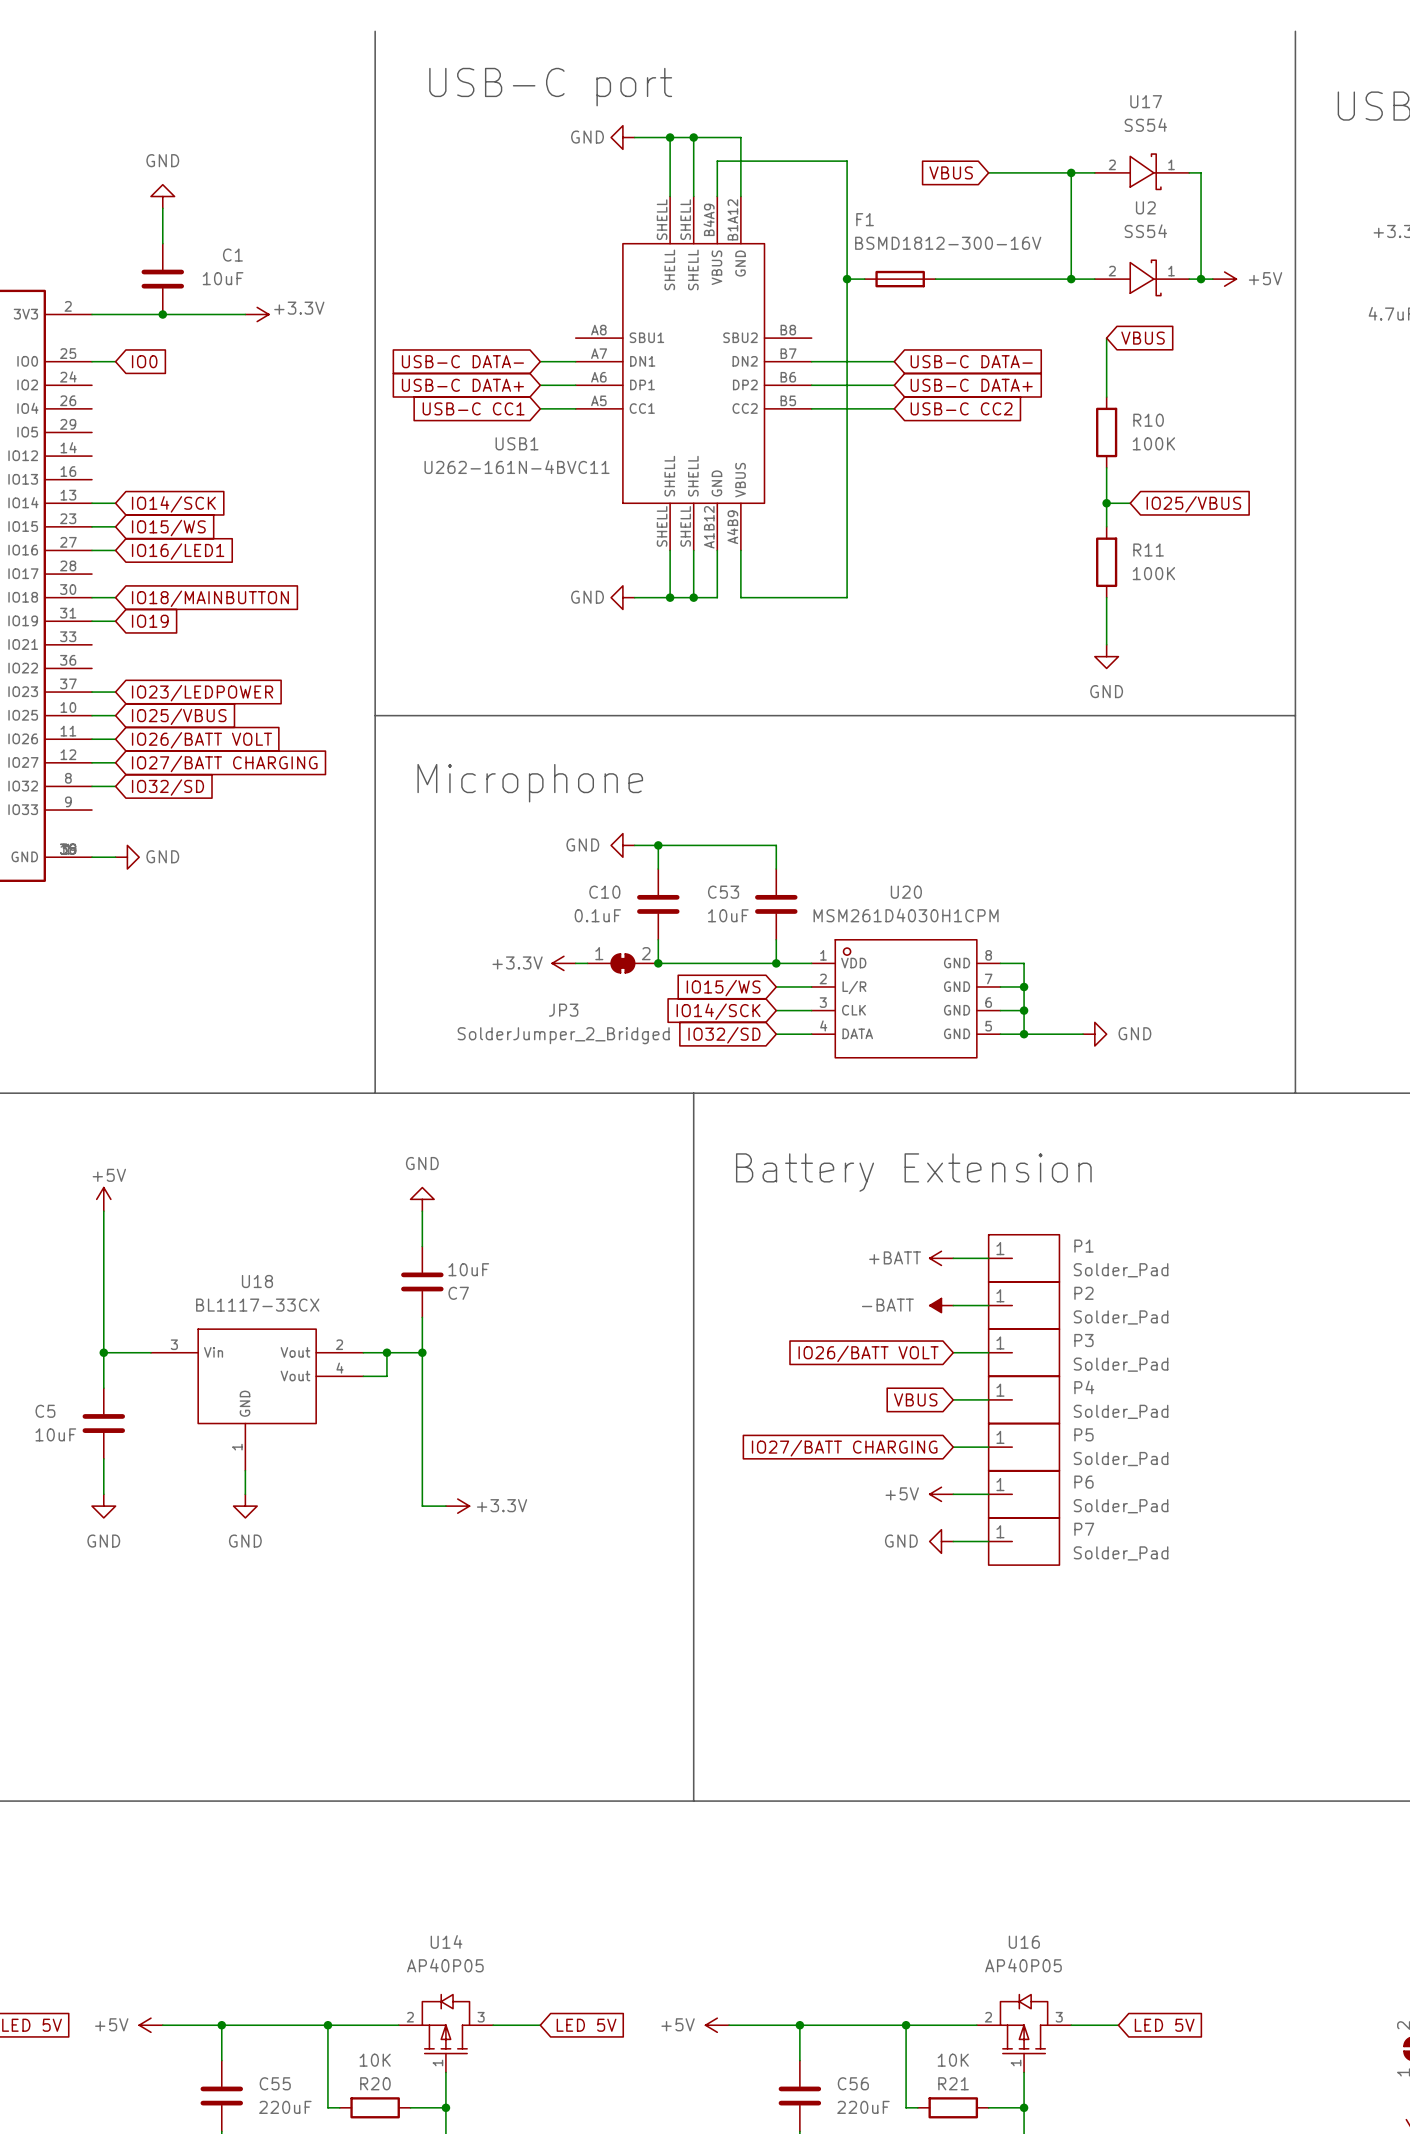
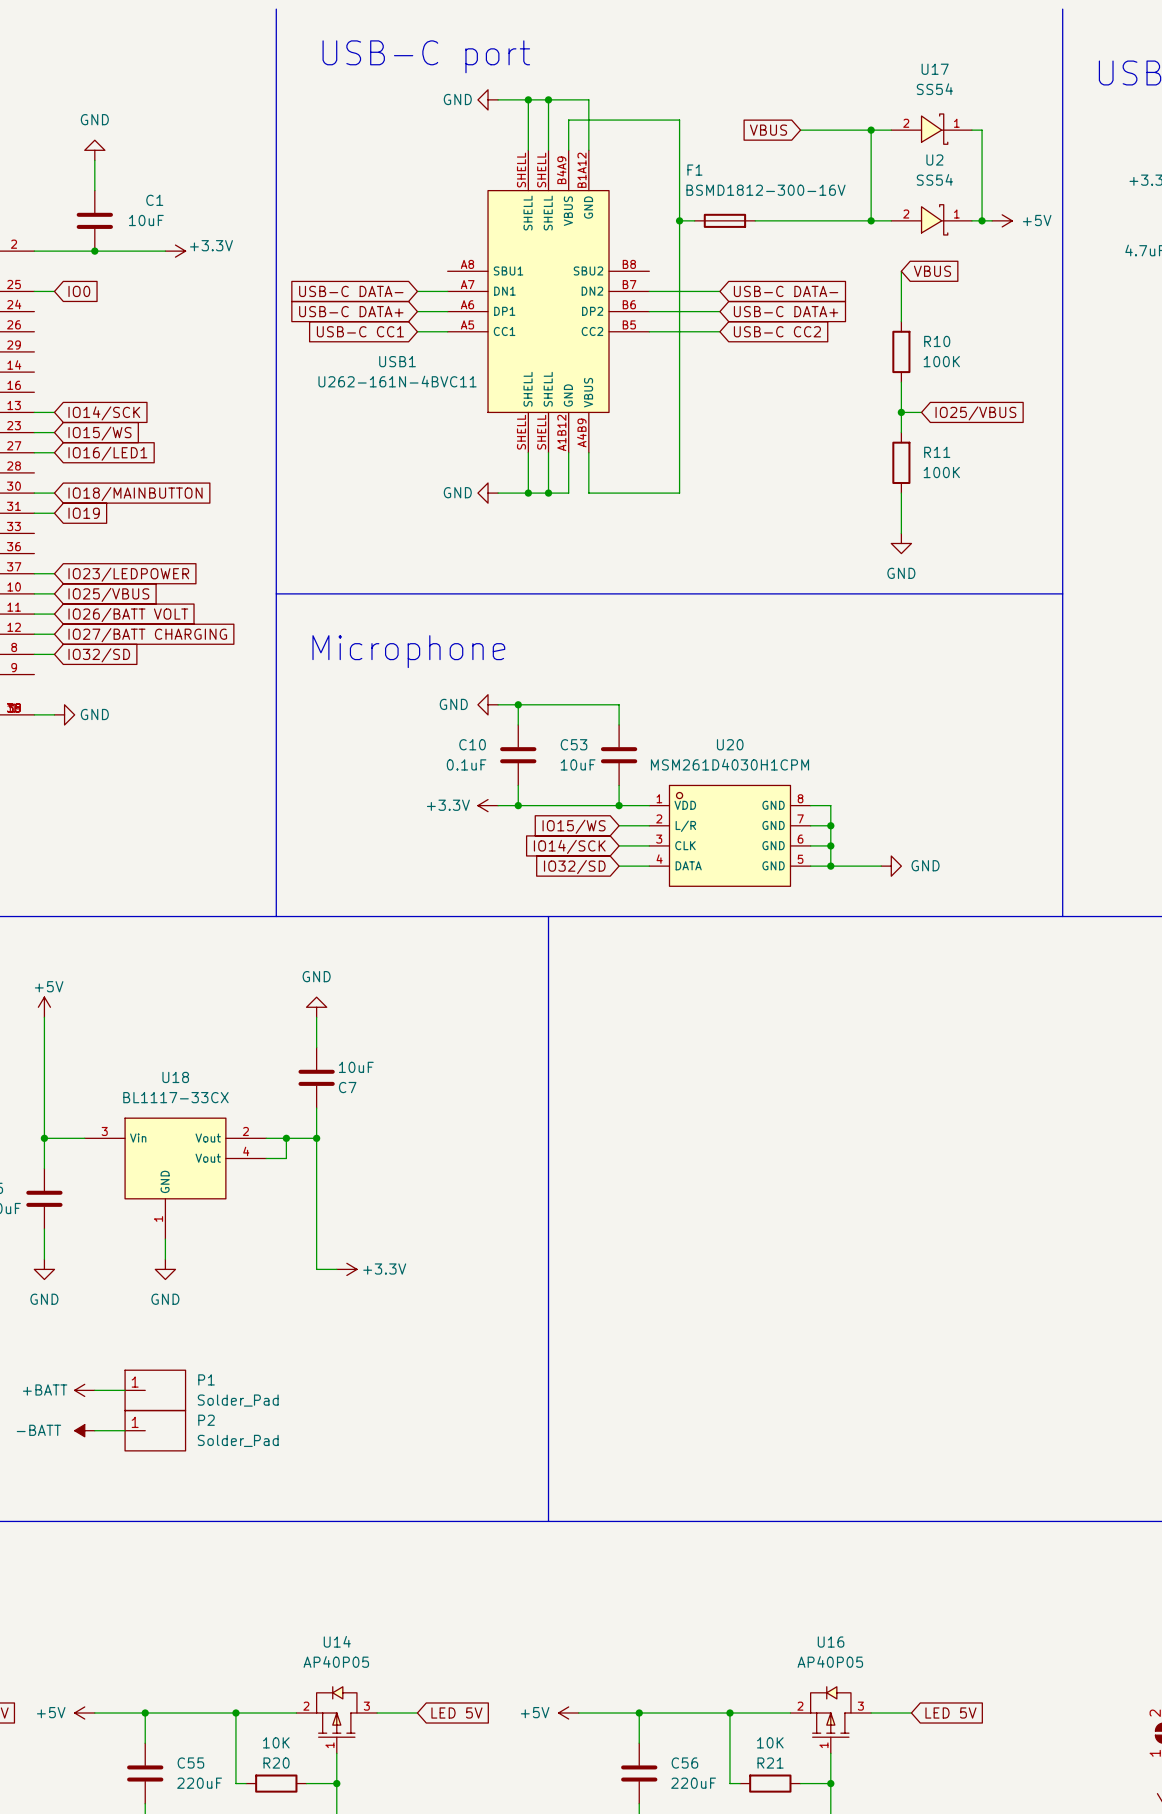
power symbol position: +3.3V (563, 963) -> +3.3V (488, 805)
wire: (575, 963) (587, 963) -> none
JP3: SolderJumper_2_Bridged (622, 963) -> none
text: Battery Extension (913, 1172) -> none
power symbol: +BATT (941, 1258) -> none
wire: (953, 1258) (988, 1258) -> none
P1 position: (1024, 1258) -> (155, 1390)
power symbol: -BATT (941, 1305) -> none
wire: (953, 1305) (988, 1305) -> none
P2 position: (1024, 1305) -> (155, 1430)
wire: (953, 1352) (988, 1352) -> none
P3: Solder_Pad (1024, 1352) -> none
global label: IO26/BATT VOLT (868, 1353) -> none
global label: VBUS (915, 1399) -> none
wire: (953, 1399) (988, 1399) -> none
P4: Solder_Pad (1024, 1399) -> none
wire: (953, 1447) (988, 1447) -> none
P5: Solder_Pad (1024, 1447) -> none
global label: IO27/BATT CHARGING (844, 1448) -> none
power symbol: +5V (941, 1494) -> none
wire: (953, 1494) (988, 1494) -> none
P6: Solder_Pad (1024, 1494) -> none
power symbol: GND (941, 1541) -> none
wire: (953, 1541) (988, 1541) -> none
P7: Solder_Pad (1024, 1541) -> none
power symbol: none -> +BATT (84, 1390)
wire: none -> (94, 1390) (125, 1390)
power symbol: none -> -BATT (84, 1430)
wire: none -> (94, 1430) (125, 1430)

